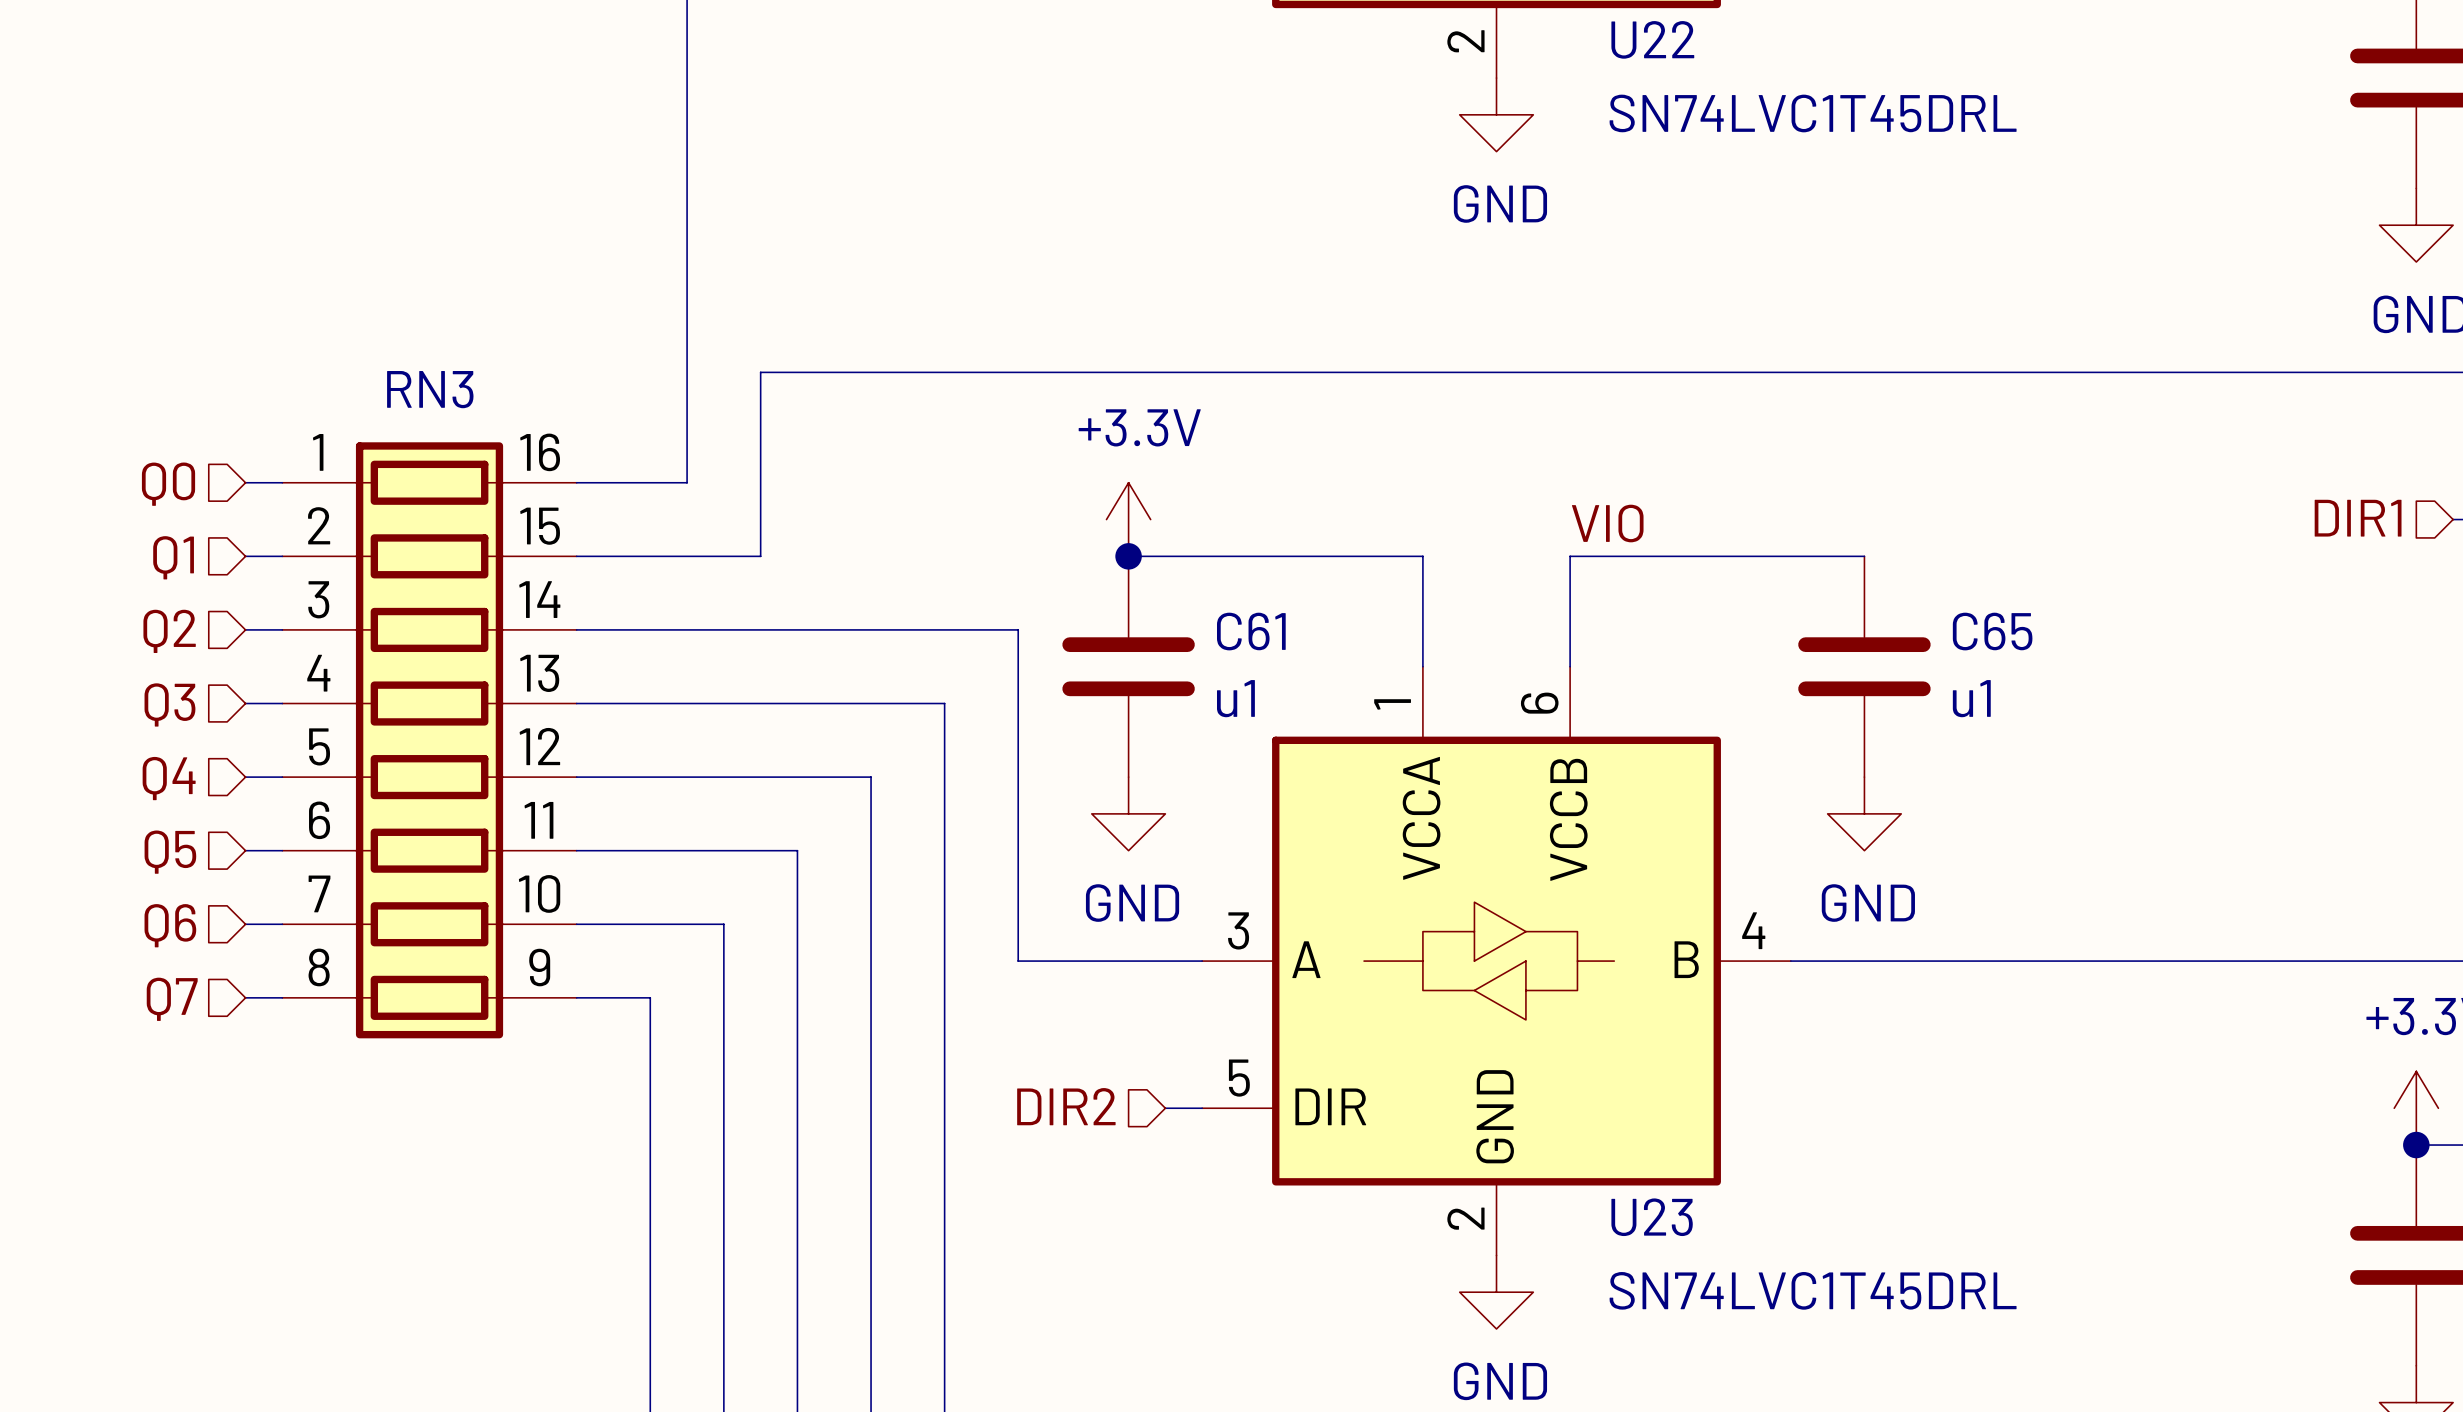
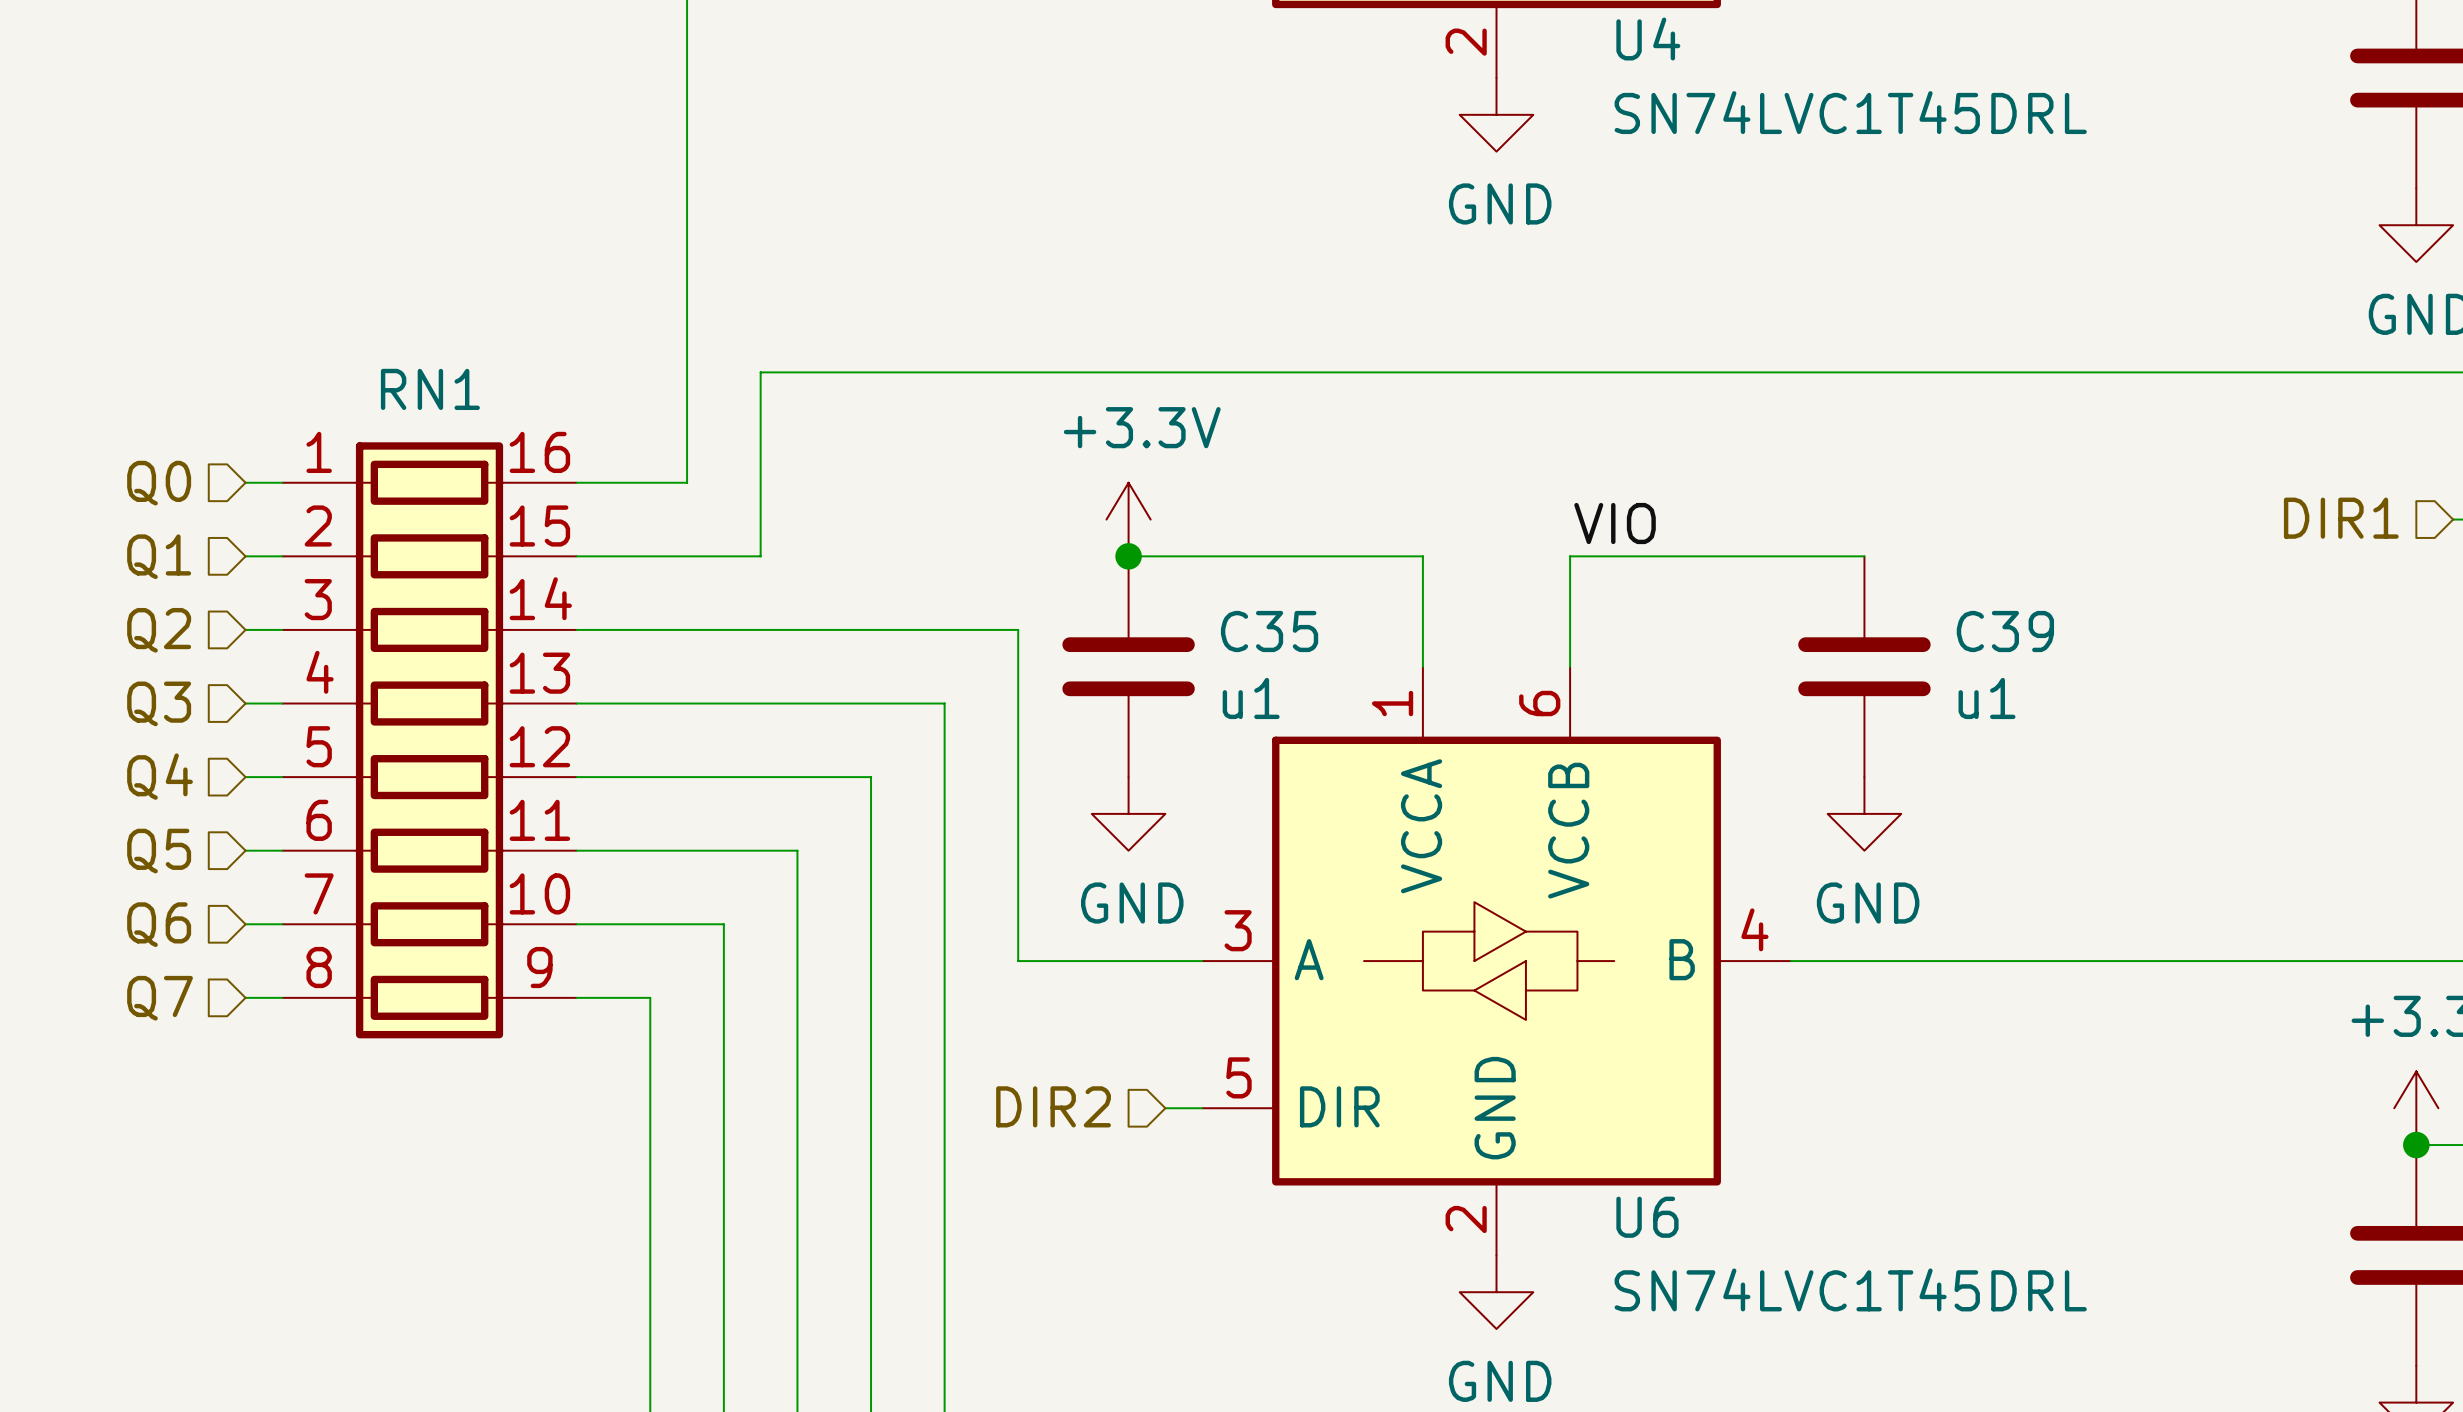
U22 name: U22 (1652, 39) -> U4 (1648, 39)
RN3 name: RN3 (430, 389) -> RN1 (430, 389)
C61 name: C61 (1251, 631) -> C35 (1269, 631)
C65 name: C65 (1992, 631) -> C39 (2005, 631)
U23 name: U23 (1652, 1217) -> U6 (1647, 1217)

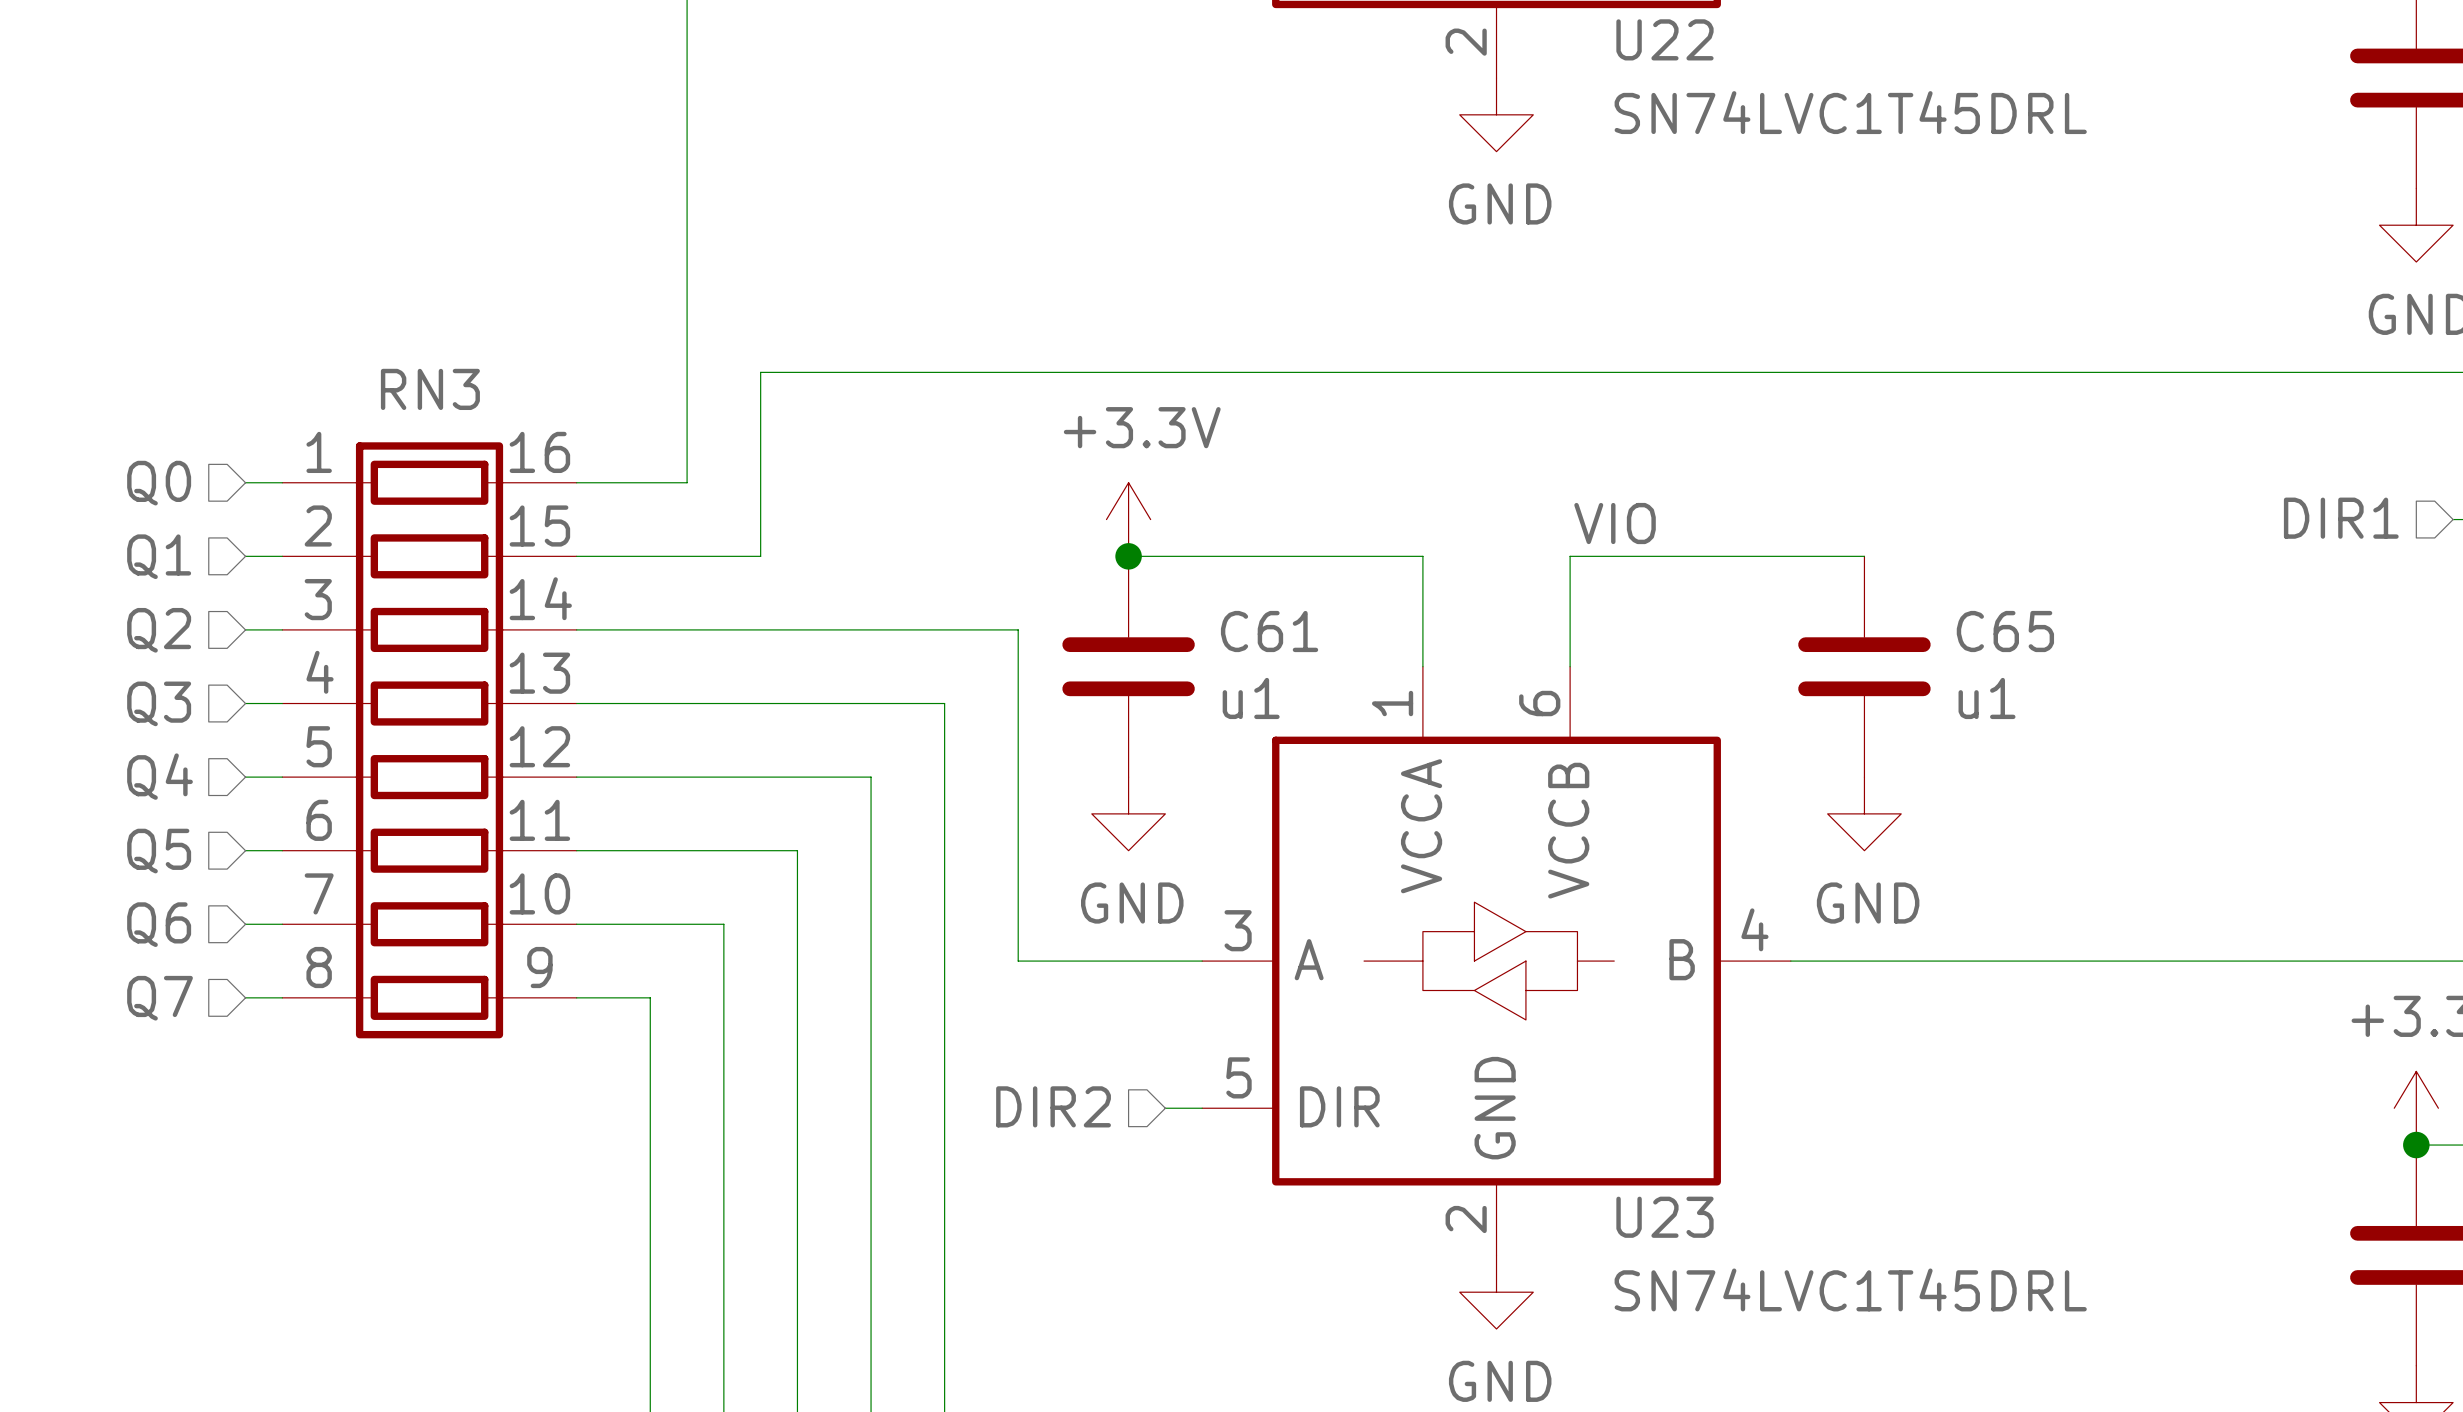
U4 name: U4 (1648, 39) -> U22 (1664, 39)
RN1 name: RN1 (430, 389) -> RN3 (430, 389)
C35 name: C35 (1269, 631) -> C61 (1269, 631)
C39 name: C39 (2005, 631) -> C65 (2005, 631)
U6 name: U6 (1647, 1217) -> U23 (1664, 1217)

